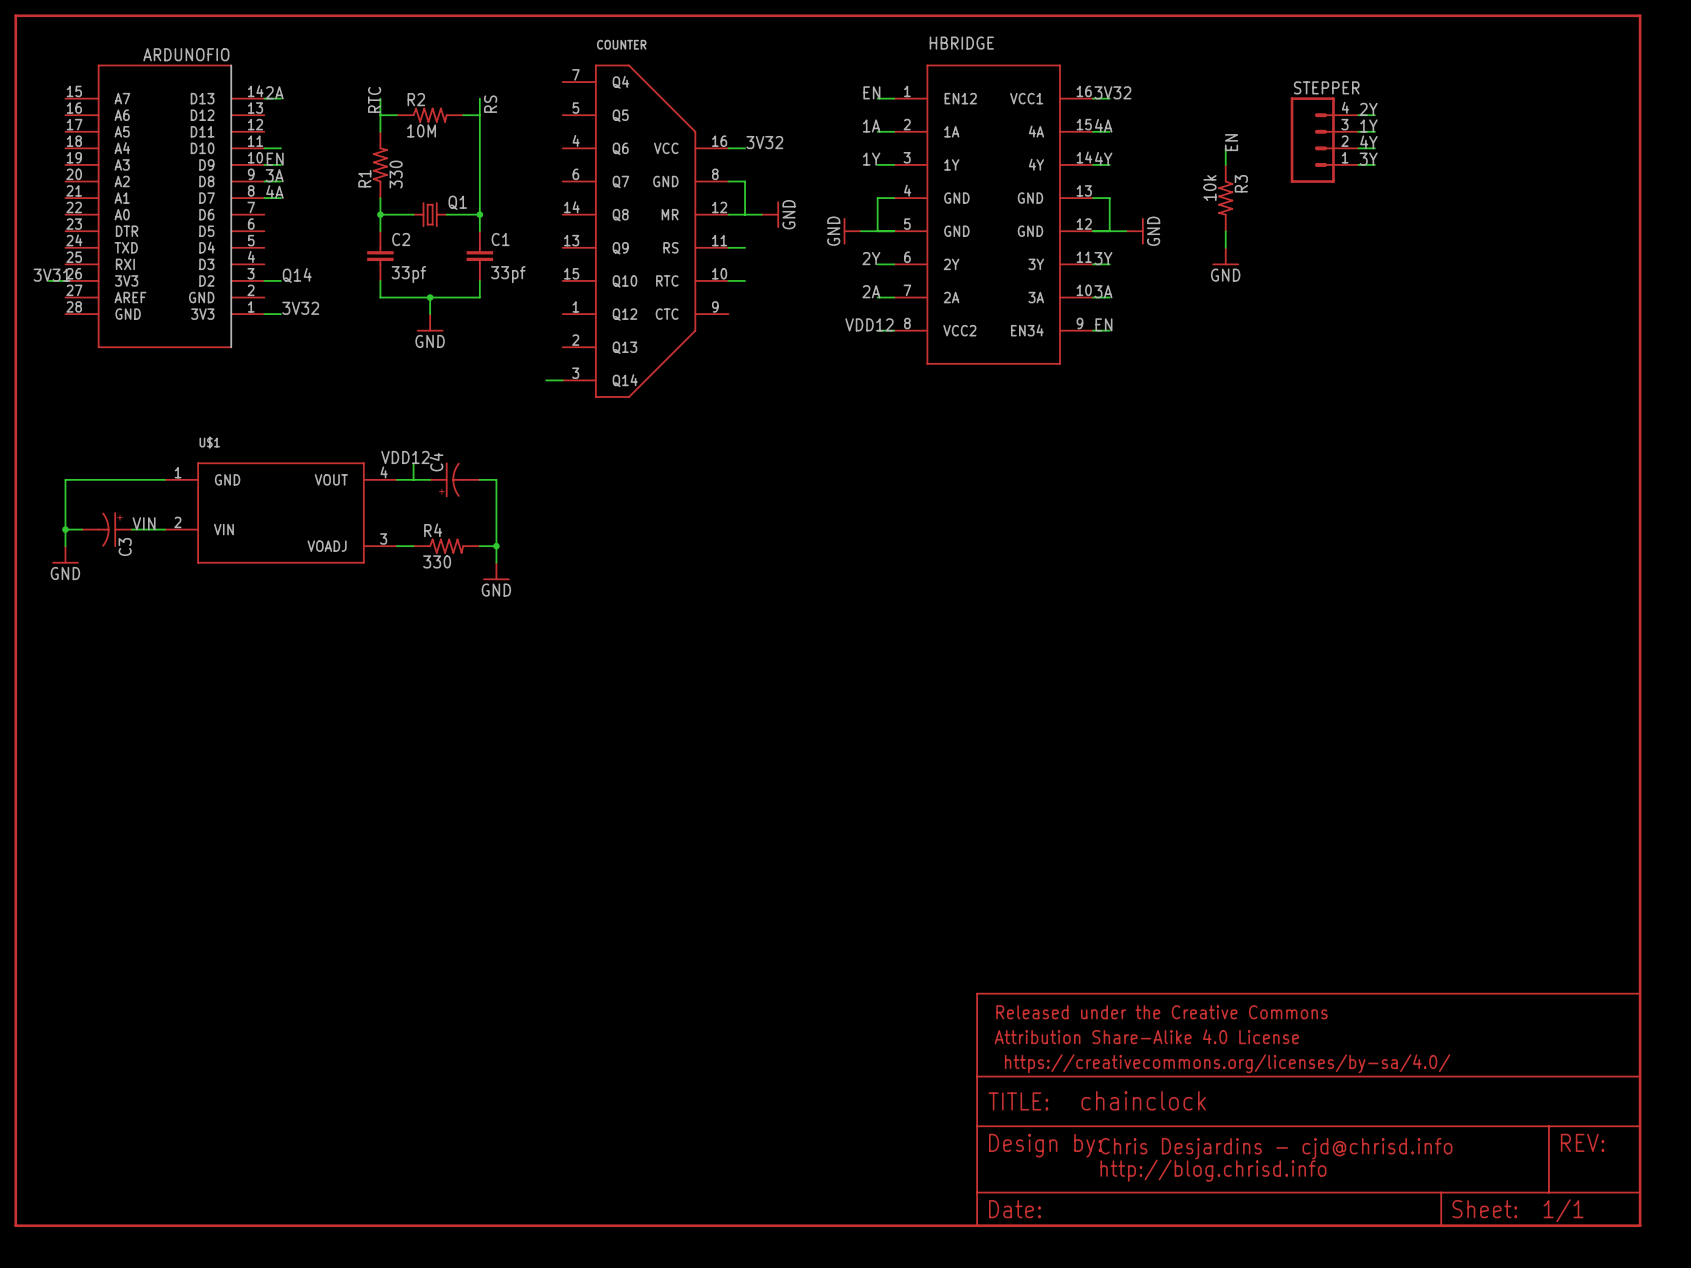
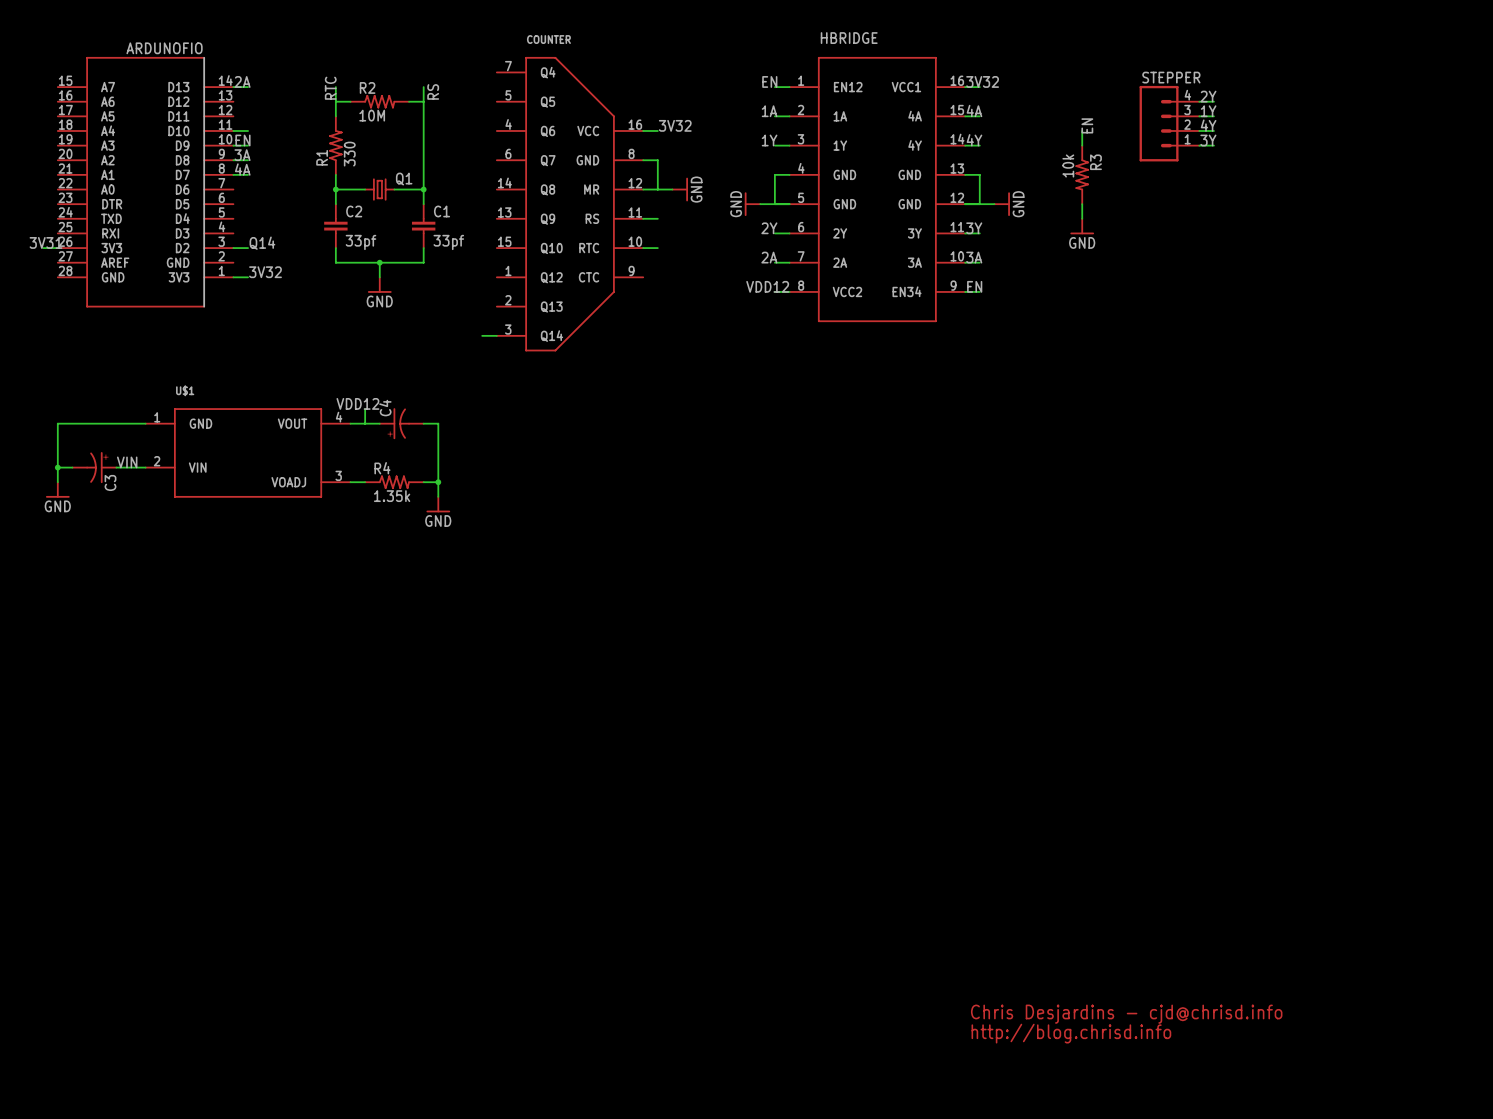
R4 value: 330 (437, 561) -> 1.35k (392, 496)
part: (827, 620) -> none
part: (1308, 1109) -> none

